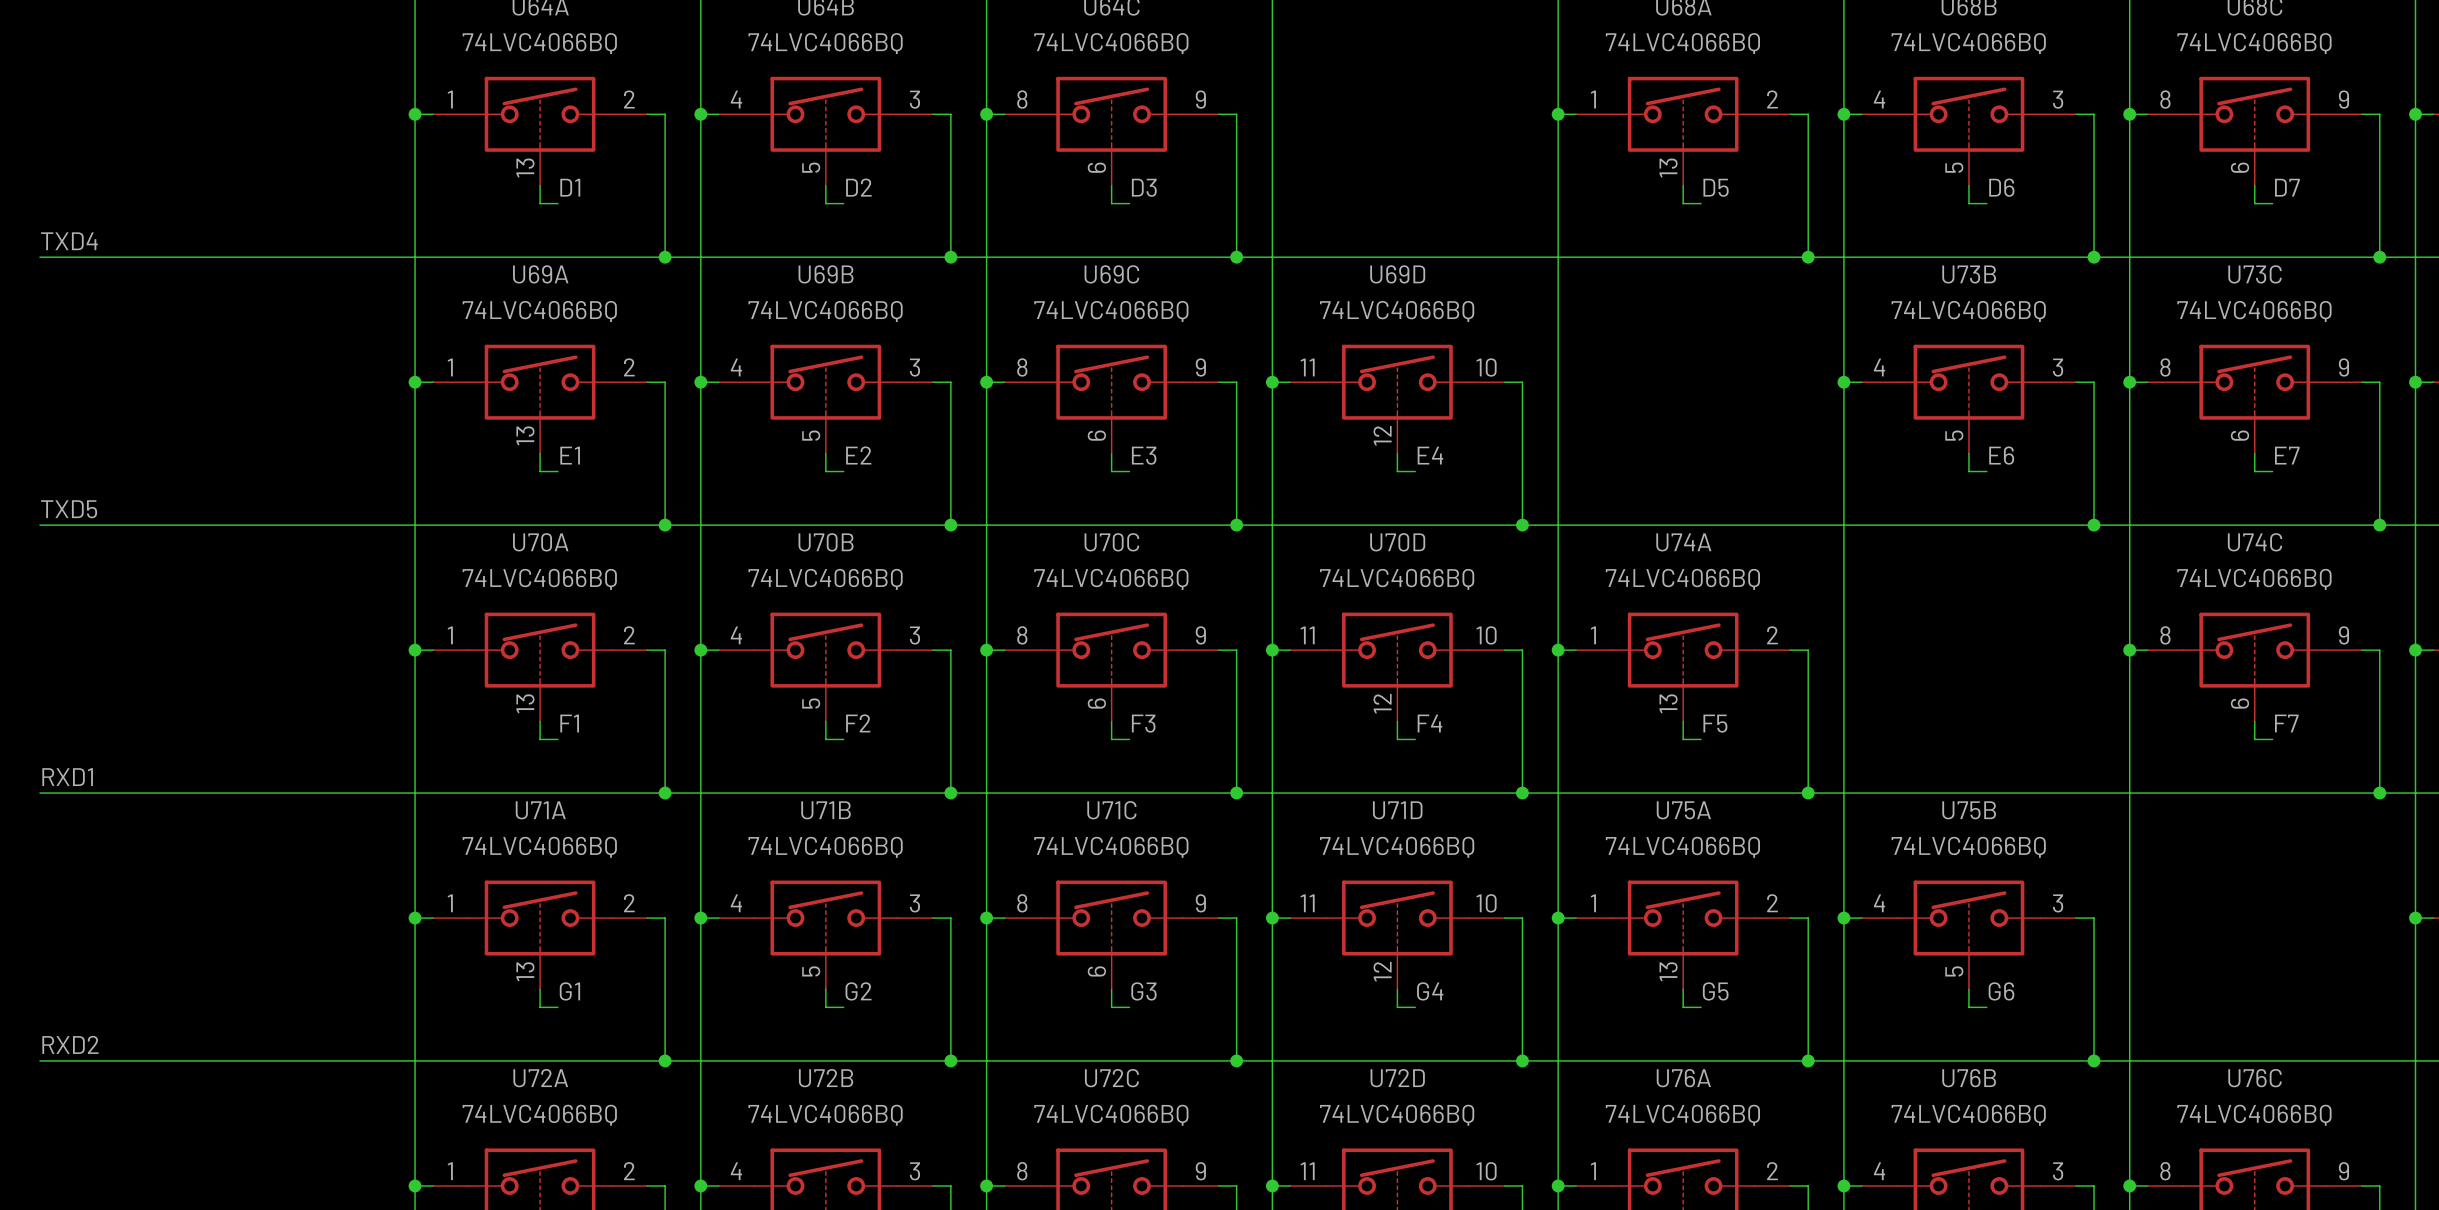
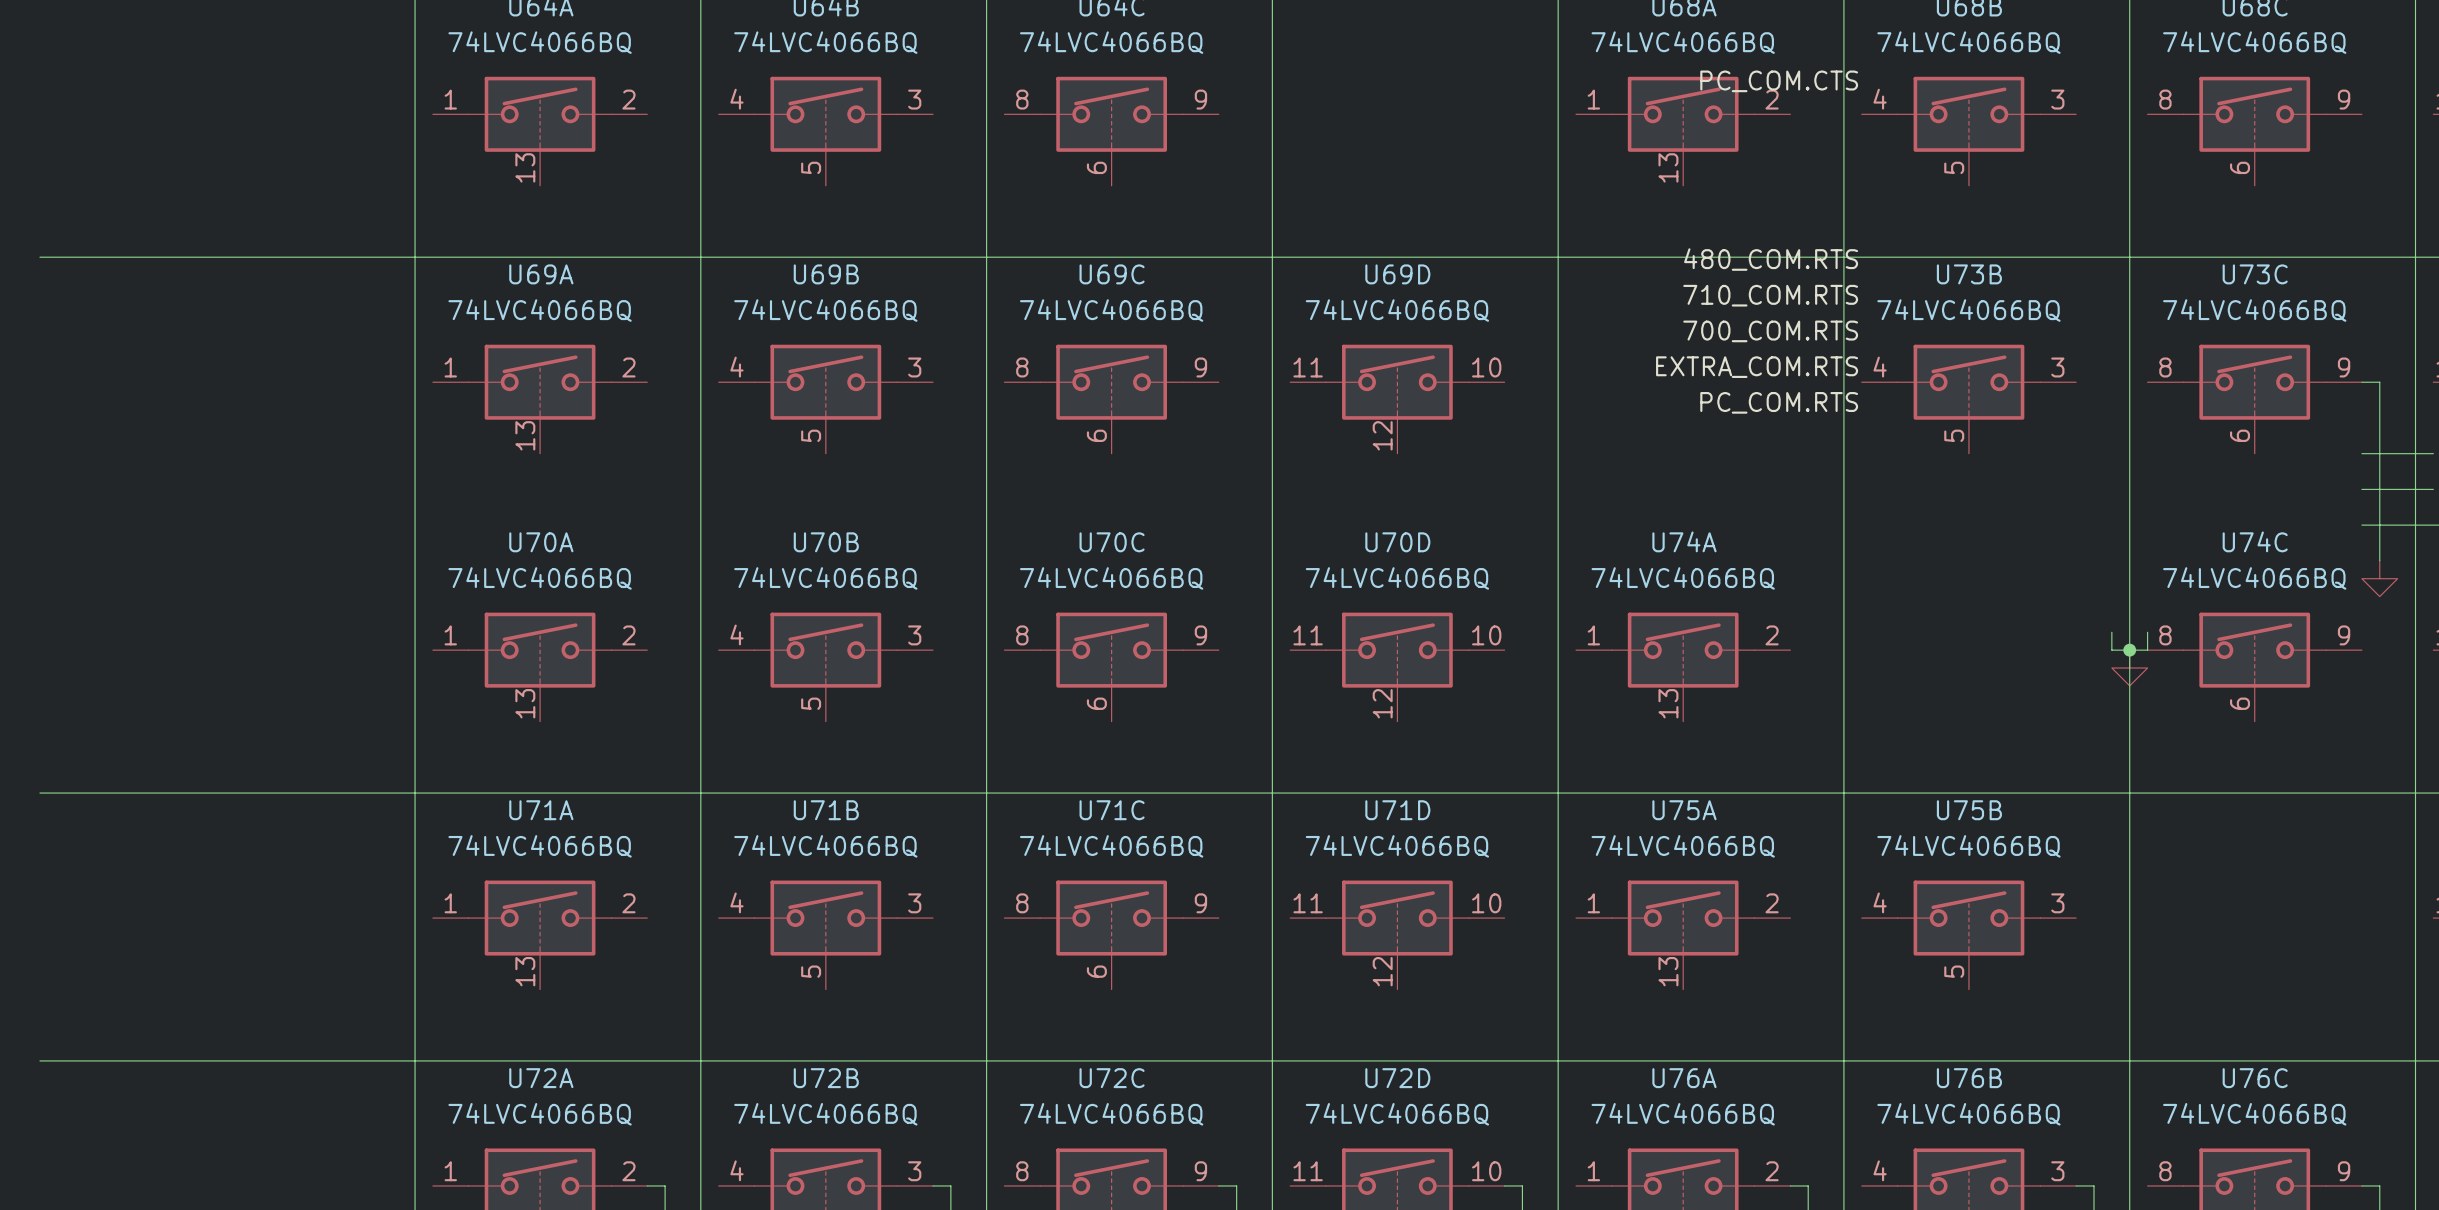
label: none -> PC_COM.CTS (1779, 81)
wire: (415, 114) (432, 114) -> none
junction: (415, 114) -> none
wire: (647, 114) (665, 114) (665, 257) -> none
wire: (700, 114) (718, 114) -> none
junction: (700, 114) -> none
wire: (933, 114) (950, 114) (950, 257) -> none
wire: (986, 114) (1004, 114) -> none
junction: (986, 114) -> none
wire: (1218, 114) (1236, 114) (1236, 257) -> none
wire: (1558, 114) (1576, 114) -> none
junction: (1558, 114) -> none
wire: (1790, 114) (1808, 114) (1808, 257) -> none
wire: (1843, 114) (1861, 114) -> none
junction: (1843, 114) -> none
wire: (2076, 114) (2093, 114) (2093, 257) -> none
wire: (2129, 114) (2147, 114) -> none
junction: (2129, 114) -> none
wire: (2361, 114) (2379, 114) (2379, 257) -> none
wire: (2415, 114) (2433, 114) -> none
junction: (2415, 114) -> none
wire: (540, 185) (540, 203) (557, 203) -> none
wire: (825, 185) (825, 203) (843, 203) -> none
wire: (1111, 185) (1111, 203) (1129, 203) -> none
wire: (1683, 185) (1683, 203) (1701, 203) -> none
wire: (1968, 185) (1968, 203) (1986, 203) -> none
wire: (2254, 185) (2254, 203) (2272, 203) -> none
label: D1 (570, 187) -> none
label: D2 (858, 187) -> none
label: D3 (1144, 187) -> none
label: D5 (1716, 187) -> none
label: D6 (2001, 187) -> none
label: D7 (2287, 187) -> none
label: TXD4 (69, 241) -> none
junction: (665, 257) -> none
junction: (950, 257) -> none
junction: (1236, 257) -> none
junction: (1808, 257) -> none
junction: (2093, 257) -> none
junction: (2379, 257) -> none
label: none -> 480_COM.RTS (1771, 259)
label: none -> 710_COM.RTS (1770, 295)
label: none -> 700_COM.RTS (1770, 331)
label: none -> EXTRA_COM.RTS (1757, 367)
wire: (415, 382) (432, 382) -> none
junction: (415, 382) -> none
wire: (647, 382) (665, 382) (665, 525) -> none
wire: (700, 382) (718, 382) -> none
junction: (700, 382) -> none
wire: (933, 382) (950, 382) (950, 525) -> none
wire: (986, 382) (1004, 382) -> none
junction: (986, 382) -> none
wire: (1218, 382) (1236, 382) (1236, 525) -> none
wire: (1272, 382) (1290, 382) -> none
junction: (1272, 382) -> none
wire: (1504, 382) (1522, 382) (1522, 525) -> none
wire: (1843, 382) (1861, 382) -> none
junction: (1843, 382) -> none
wire: (2076, 382) (2093, 382) (2093, 525) -> none
wire: (2129, 382) (2147, 382) -> none
junction: (2129, 382) -> none
wire: (2415, 382) (2433, 382) -> none
junction: (2415, 382) -> none
label: none -> PC_COM.RTS (1779, 402)
wire: (540, 453) (540, 471) (557, 471) -> none
wire: (825, 453) (825, 471) (843, 471) -> none
wire: (1111, 453) (1111, 471) (1129, 471) -> none
wire: (1397, 453) (1397, 471) (1415, 471) -> none
wire: (1968, 453) (1968, 471) (1986, 471) -> none
wire: (2254, 453) (2254, 471) (2272, 471) -> none
wire: none -> (2361, 453) (2433, 453)
label: E1 (570, 455) -> none
label: E2 (858, 455) -> none
label: E3 (1144, 455) -> none
label: E4 (1430, 455) -> none
label: E6 (2001, 455) -> none
label: E7 (2287, 455) -> none
wire: none -> (2361, 489) (2433, 489)
label: TXD5 (69, 509) -> none
wire: (39, 525) (2361, 525) -> none
junction: (665, 525) -> none
junction: (950, 525) -> none
junction: (1236, 525) -> none
junction: (1522, 525) -> none
junction: (2093, 525) -> none
wire: none -> (2379, 525) (2379, 560)
junction: (2379, 525) -> none
power symbol: none -> (2379, 578)
wire: none -> (2147, 632) (2147, 650)
wire: (415, 650) (432, 650) -> none
junction: (415, 650) -> none
wire: (647, 650) (665, 650) (665, 793) -> none
wire: (700, 650) (718, 650) -> none
junction: (700, 650) -> none
wire: (933, 650) (950, 650) (950, 793) -> none
wire: (986, 650) (1004, 650) -> none
junction: (986, 650) -> none
wire: (1218, 650) (1236, 650) (1236, 793) -> none
wire: (1272, 650) (1290, 650) -> none
junction: (1272, 650) -> none
wire: (1504, 650) (1522, 650) (1522, 793) -> none
wire: (1558, 650) (1576, 650) -> none
junction: (1558, 650) -> none
wire: (1790, 650) (1808, 650) (1808, 793) -> none
wire: (2361, 650) (2379, 650) (2379, 793) -> none
wire: (2415, 650) (2433, 650) -> none
junction: (2415, 650) -> none
power symbol: none -> (2129, 668)
wire: (540, 721) (540, 739) (557, 739) -> none
wire: (825, 721) (825, 739) (843, 739) -> none
wire: (1111, 721) (1111, 739) (1129, 739) -> none
wire: (1397, 721) (1397, 739) (1415, 739) -> none
wire: (1683, 721) (1683, 739) (1701, 739) -> none
wire: (2254, 721) (2254, 739) (2272, 739) -> (2111, 632) (2111, 650) (2129, 650)
label: F1 (569, 723) -> none
label: F2 (858, 723) -> none
label: F3 (1143, 723) -> none
label: F4 (1429, 723) -> none
label: F5 (1715, 723) -> none
label: F7 (2286, 723) -> none
label: RXD1 (67, 777) -> none
junction: (665, 793) -> none
junction: (950, 793) -> none
junction: (1236, 793) -> none
junction: (1522, 793) -> none
junction: (1808, 793) -> none
junction: (2379, 793) -> none
wire: (415, 918) (432, 918) -> none
junction: (415, 918) -> none
wire: (647, 918) (665, 918) (665, 1060) -> none
wire: (700, 918) (718, 918) -> none
junction: (700, 918) -> none
wire: (933, 918) (950, 918) (950, 1060) -> none
wire: (986, 918) (1004, 918) -> none
junction: (986, 918) -> none
wire: (1218, 918) (1236, 918) (1236, 1060) -> none
wire: (1272, 918) (1290, 918) -> none
junction: (1272, 918) -> none
wire: (1504, 918) (1522, 918) (1522, 1060) -> none
wire: (1558, 918) (1576, 918) -> none
junction: (1558, 918) -> none
wire: (1790, 918) (1808, 918) (1808, 1060) -> none
wire: (1843, 918) (1861, 918) -> none
junction: (1843, 918) -> none
wire: (2076, 918) (2093, 918) (2093, 1060) -> none
wire: (2415, 918) (2433, 918) -> none
junction: (2415, 918) -> none
wire: (540, 989) (540, 1007) (557, 1007) -> none
wire: (825, 989) (825, 1007) (843, 1007) -> none
wire: (1111, 989) (1111, 1007) (1129, 1007) -> none
wire: (1397, 989) (1397, 1007) (1415, 1007) -> none
wire: (1683, 989) (1683, 1007) (1701, 1007) -> none
wire: (1968, 989) (1968, 1007) (1986, 1007) -> none
label: G1 (569, 991) -> none
label: G2 (858, 991) -> none
label: G3 (1143, 991) -> none
label: G4 (1430, 991) -> none
label: G5 (1715, 991) -> none
label: G6 (2001, 991) -> none
label: RXD2 (70, 1044) -> none
junction: (665, 1060) -> none
junction: (950, 1060) -> none
junction: (1236, 1060) -> none
junction: (1522, 1060) -> none
junction: (1808, 1060) -> none
junction: (2093, 1060) -> none
wire: (415, 1185) (432, 1185) -> none
junction: (415, 1185) -> none
wire: (700, 1185) (718, 1185) -> none
junction: (700, 1185) -> none
wire: (986, 1185) (1004, 1185) -> none
junction: (986, 1185) -> none
wire: (1272, 1185) (1290, 1185) -> none
junction: (1272, 1185) -> none
wire: (1558, 1185) (1576, 1185) -> none
junction: (1558, 1185) -> none
wire: (1843, 1185) (1861, 1185) -> none
junction: (1843, 1185) -> none
wire: (2129, 1185) (2147, 1185) -> none
junction: (2129, 1185) -> none

